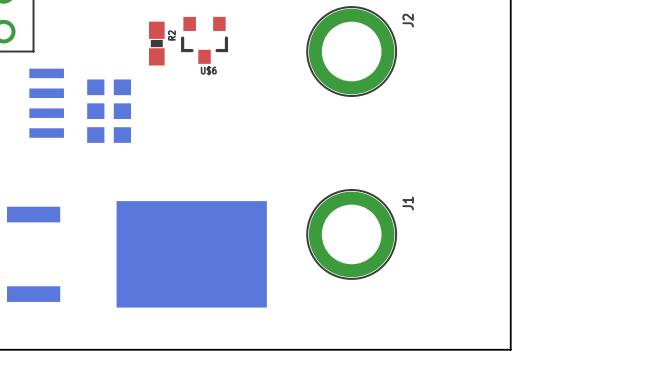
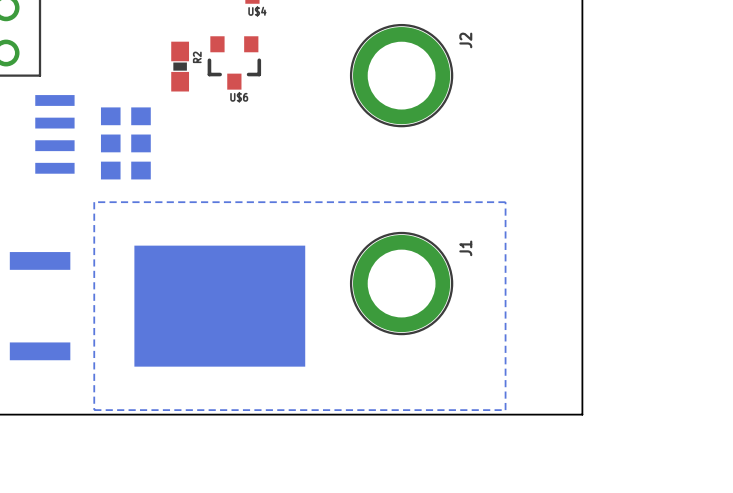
bottom zone outline: none -> (94, 202) (505, 202) (505, 410) (94, 410) (94, 202)

